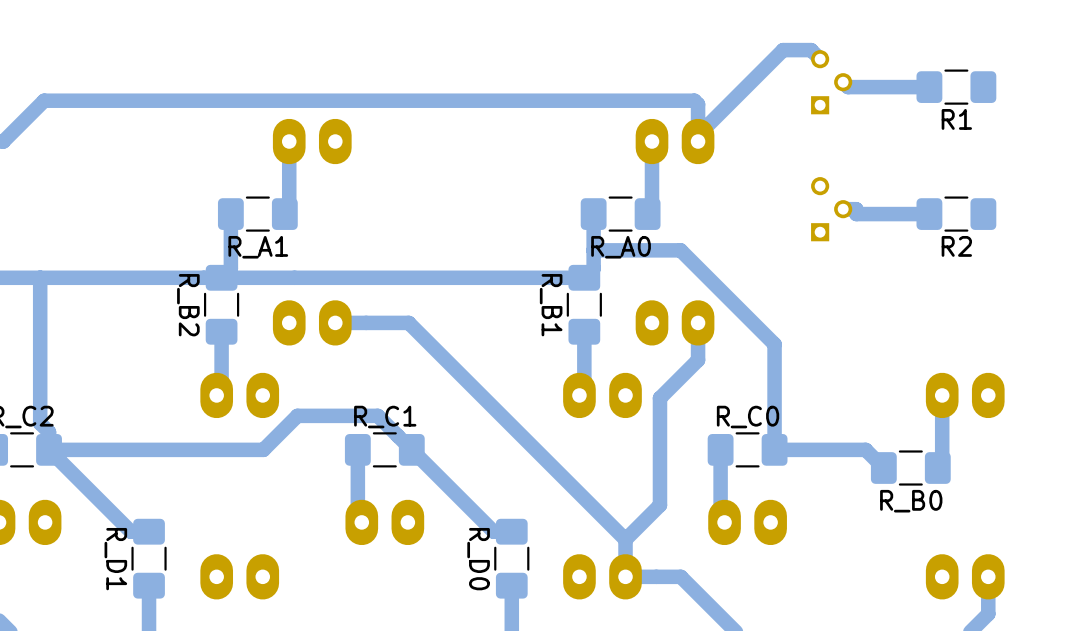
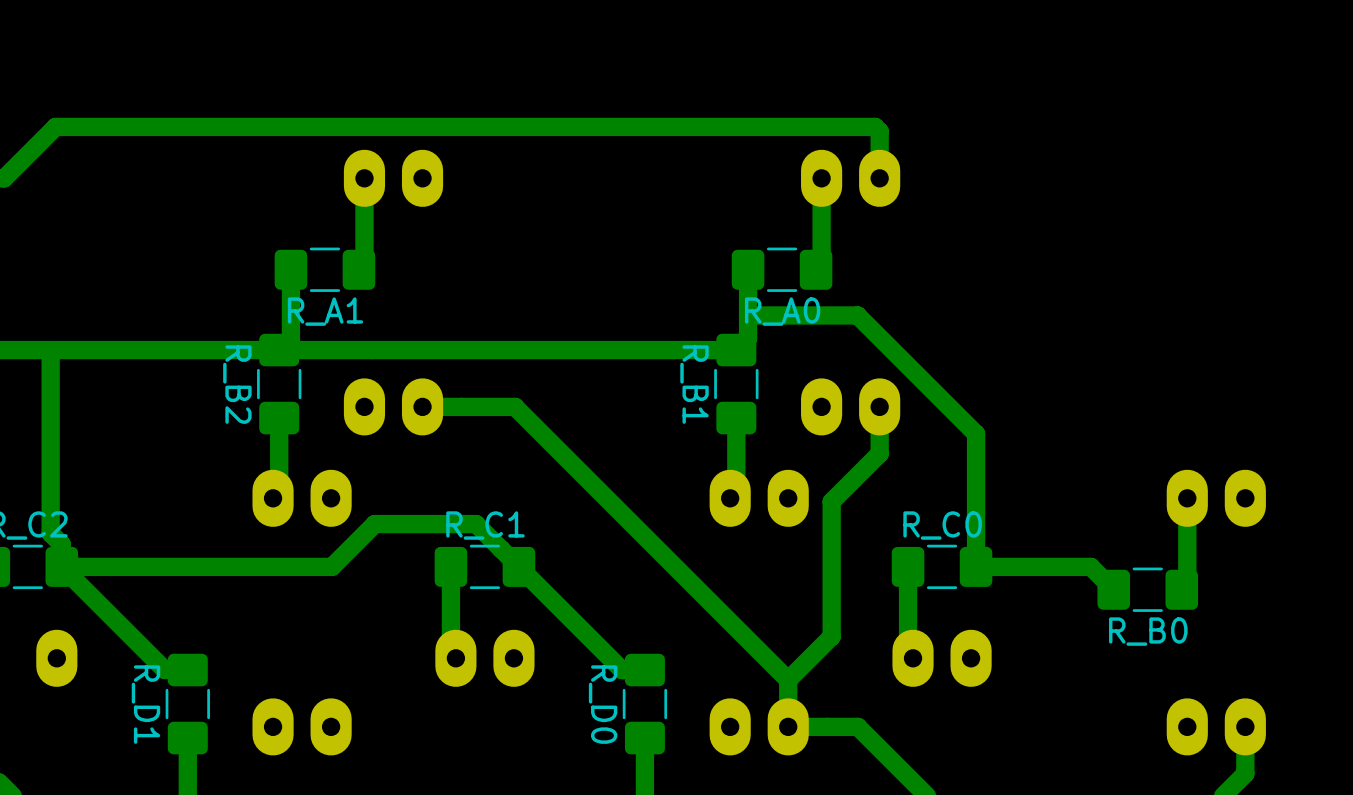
track: (820, 59) (811, 50) (783, 50) (698, 135) -> none
part: (831, 82) -> none
track: (843, 82) (848, 87) (929, 87) -> none
R1: (956, 87) -> none
part: (831, 209) -> none
track: (843, 209) (855, 209) (856, 214) (929, 214) -> none
R2: (956, 214) -> none

